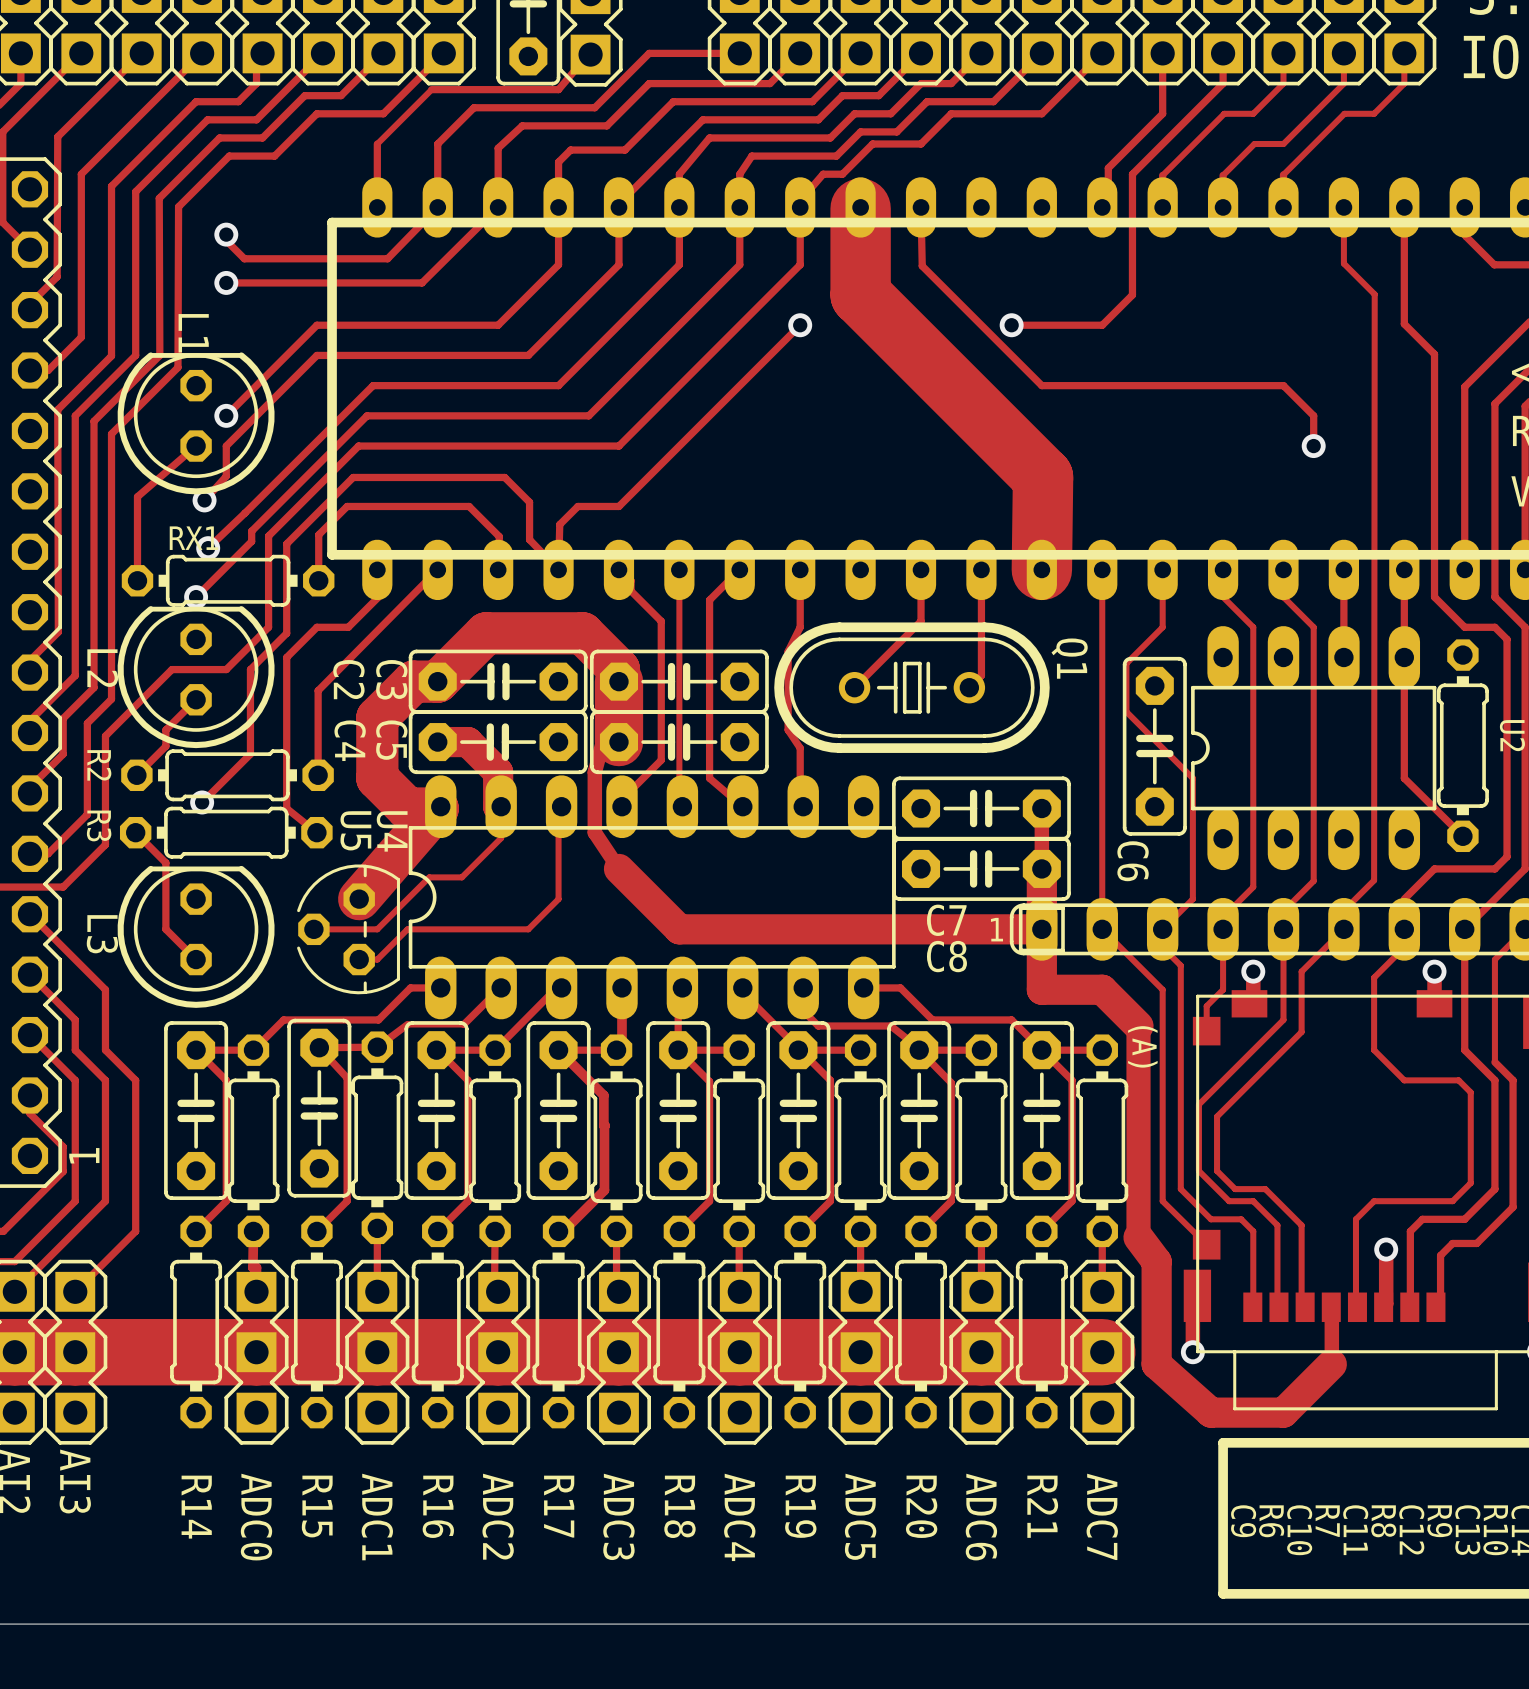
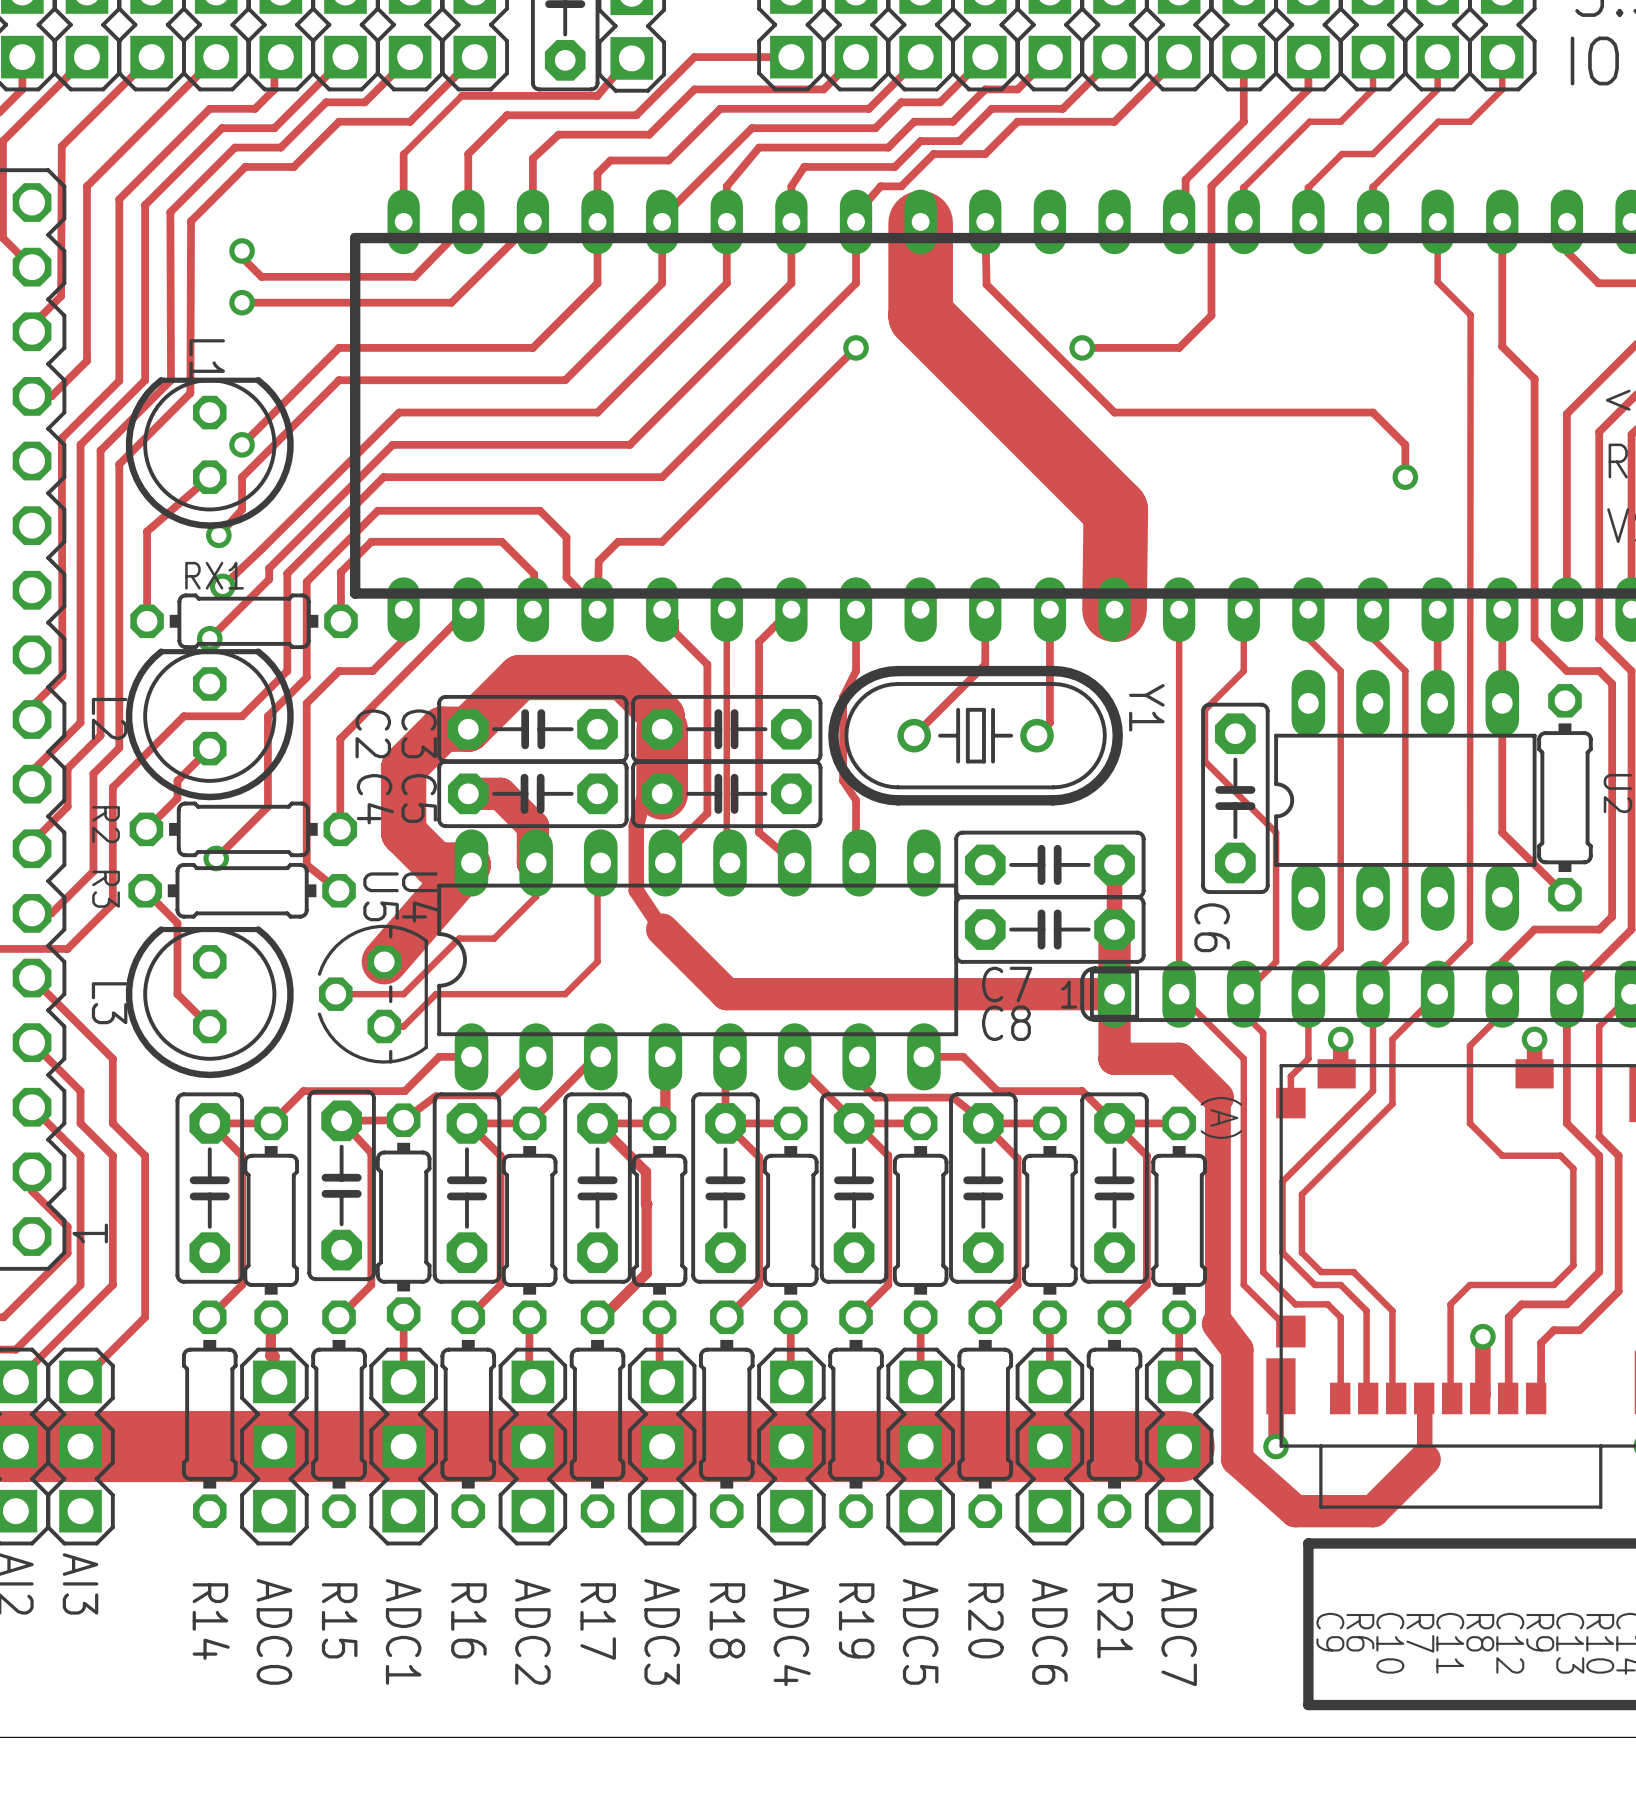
Q1 name: Q1 (1069, 658) -> Y1 (1146, 707)

